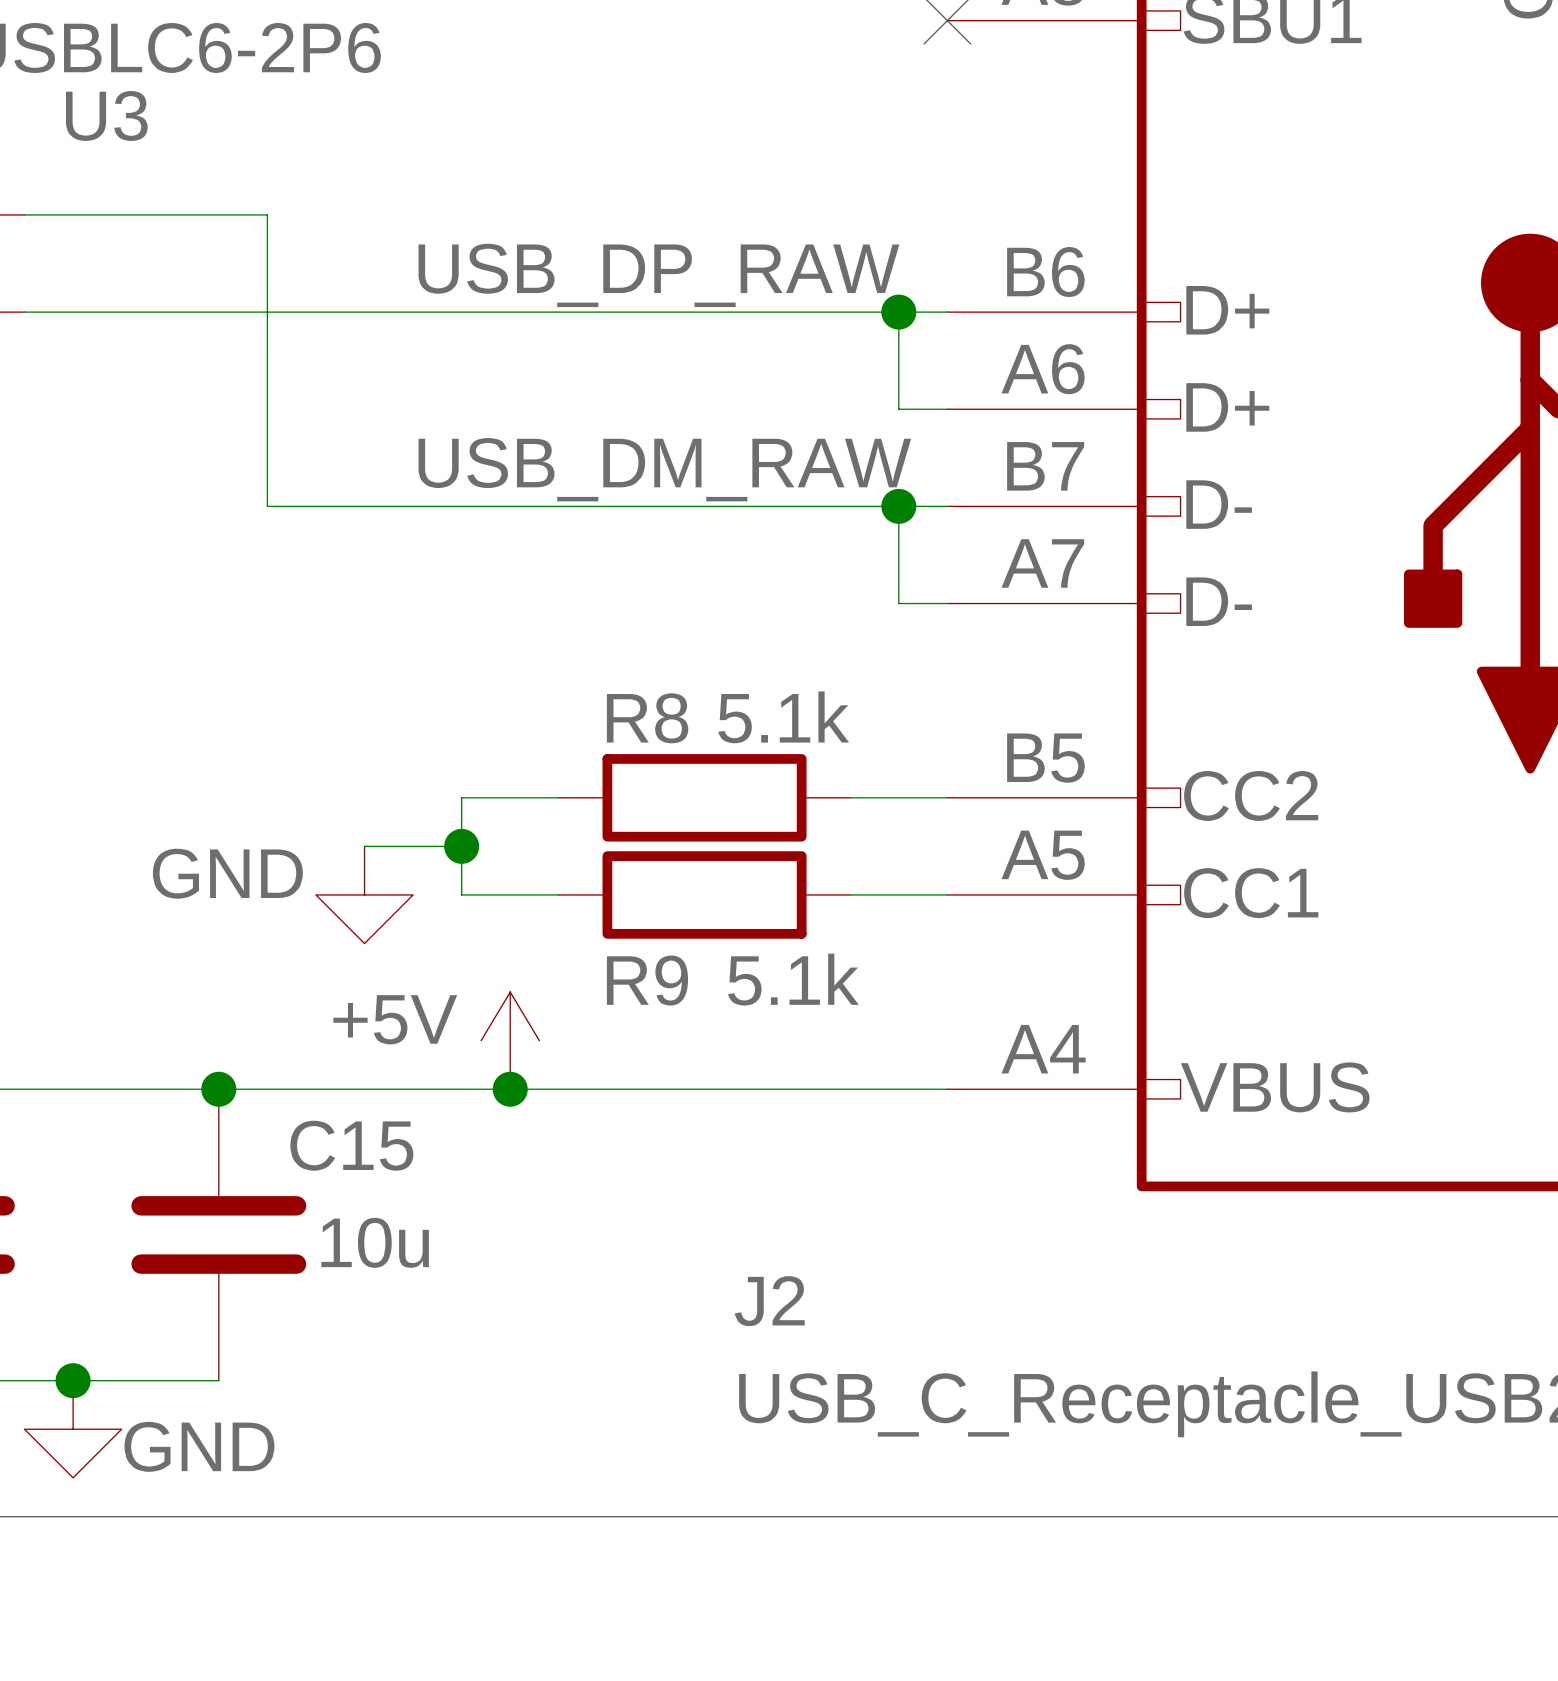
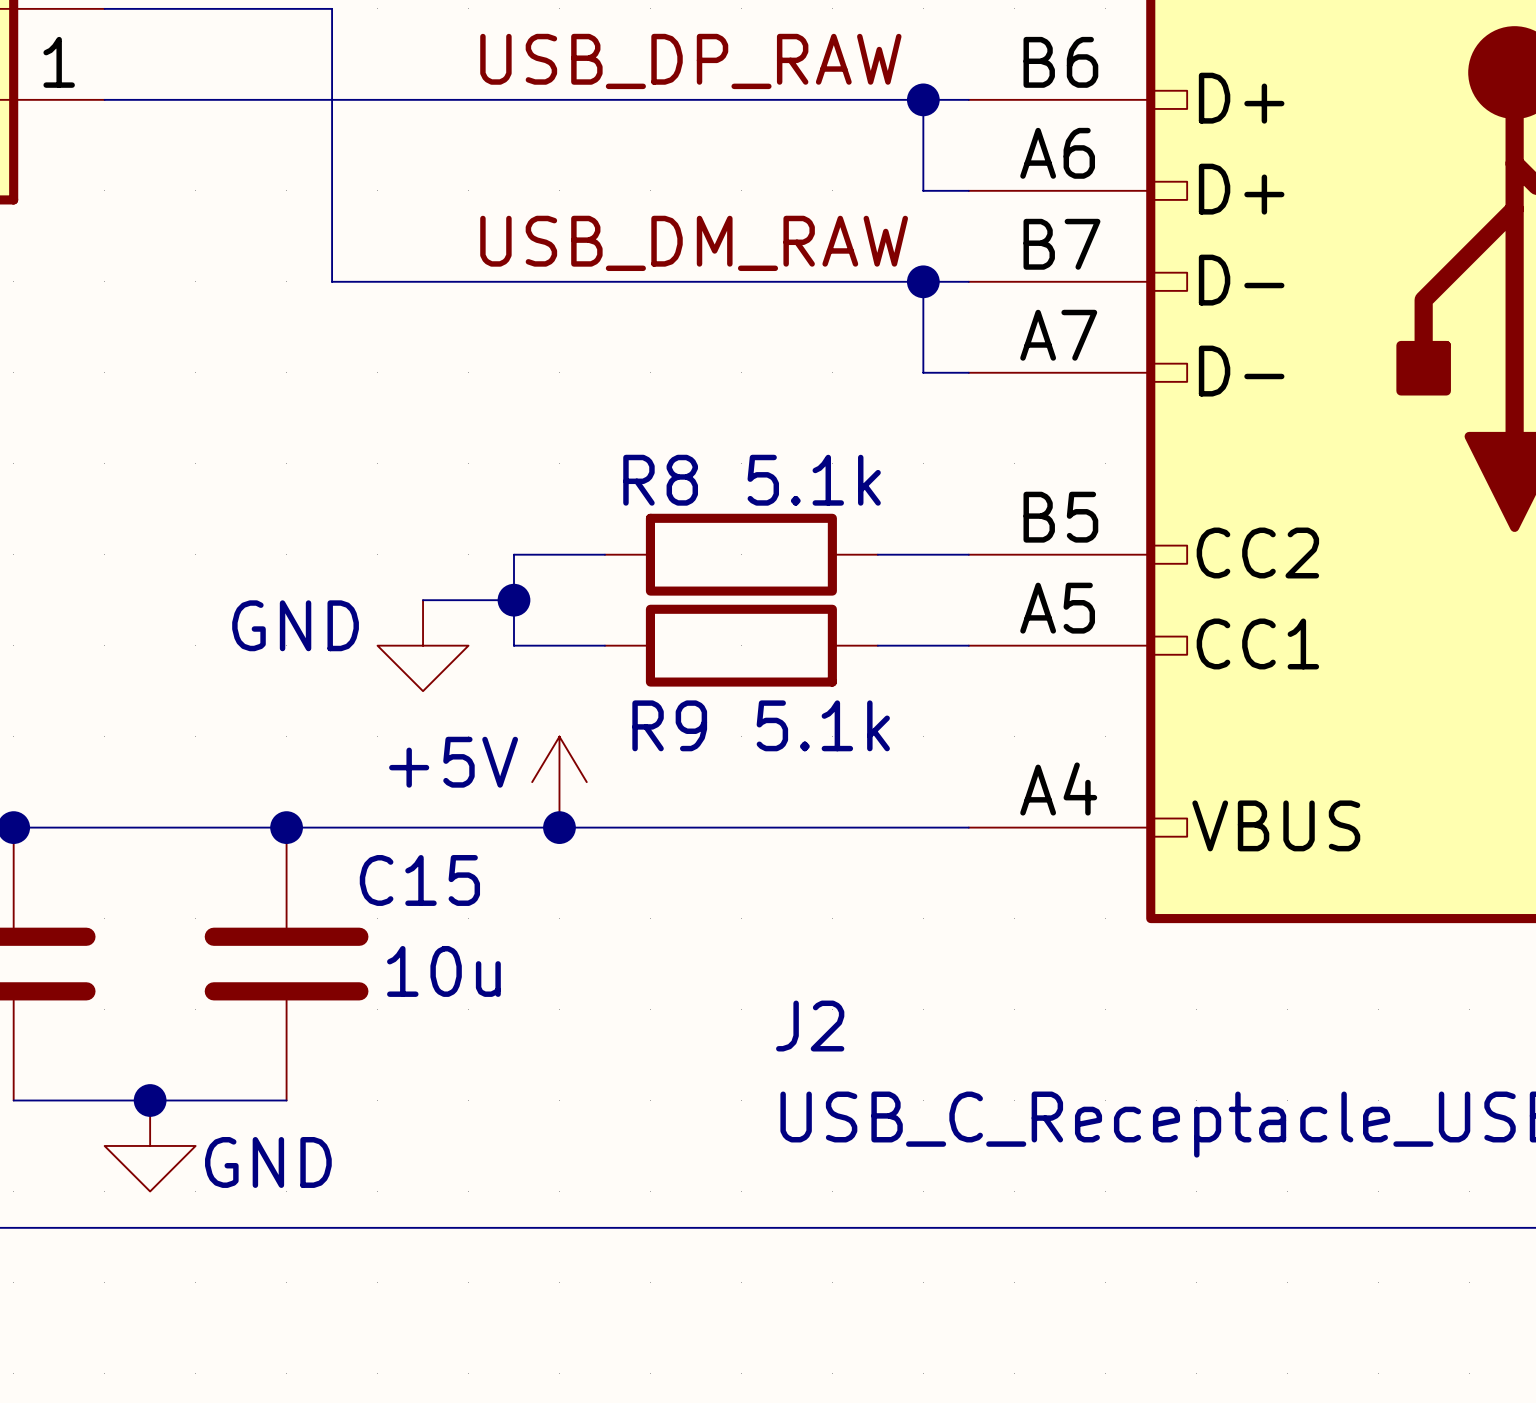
R8 name position: R8 (647, 718) -> R8 (660, 480)
R9 name position: R9 (647, 980) -> R9 (669, 725)

